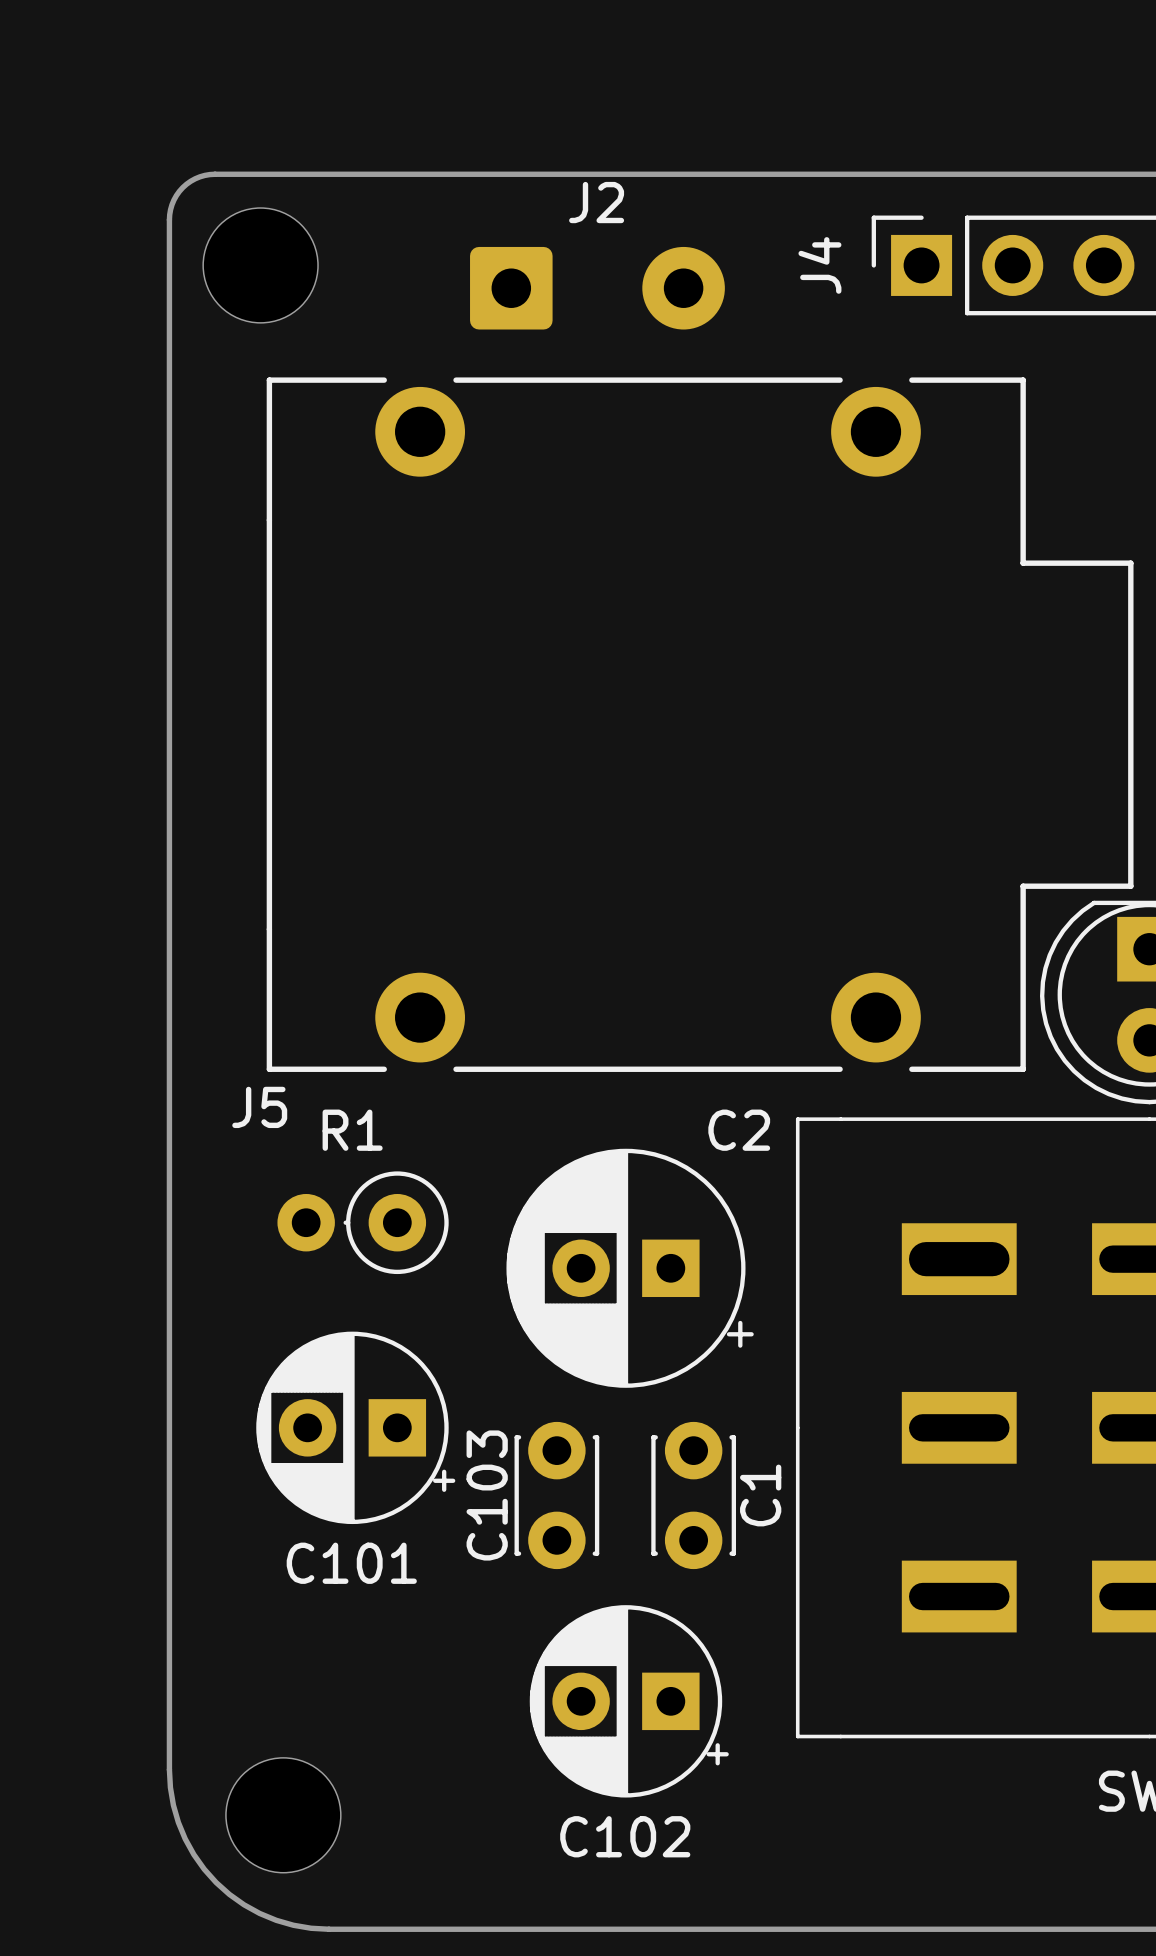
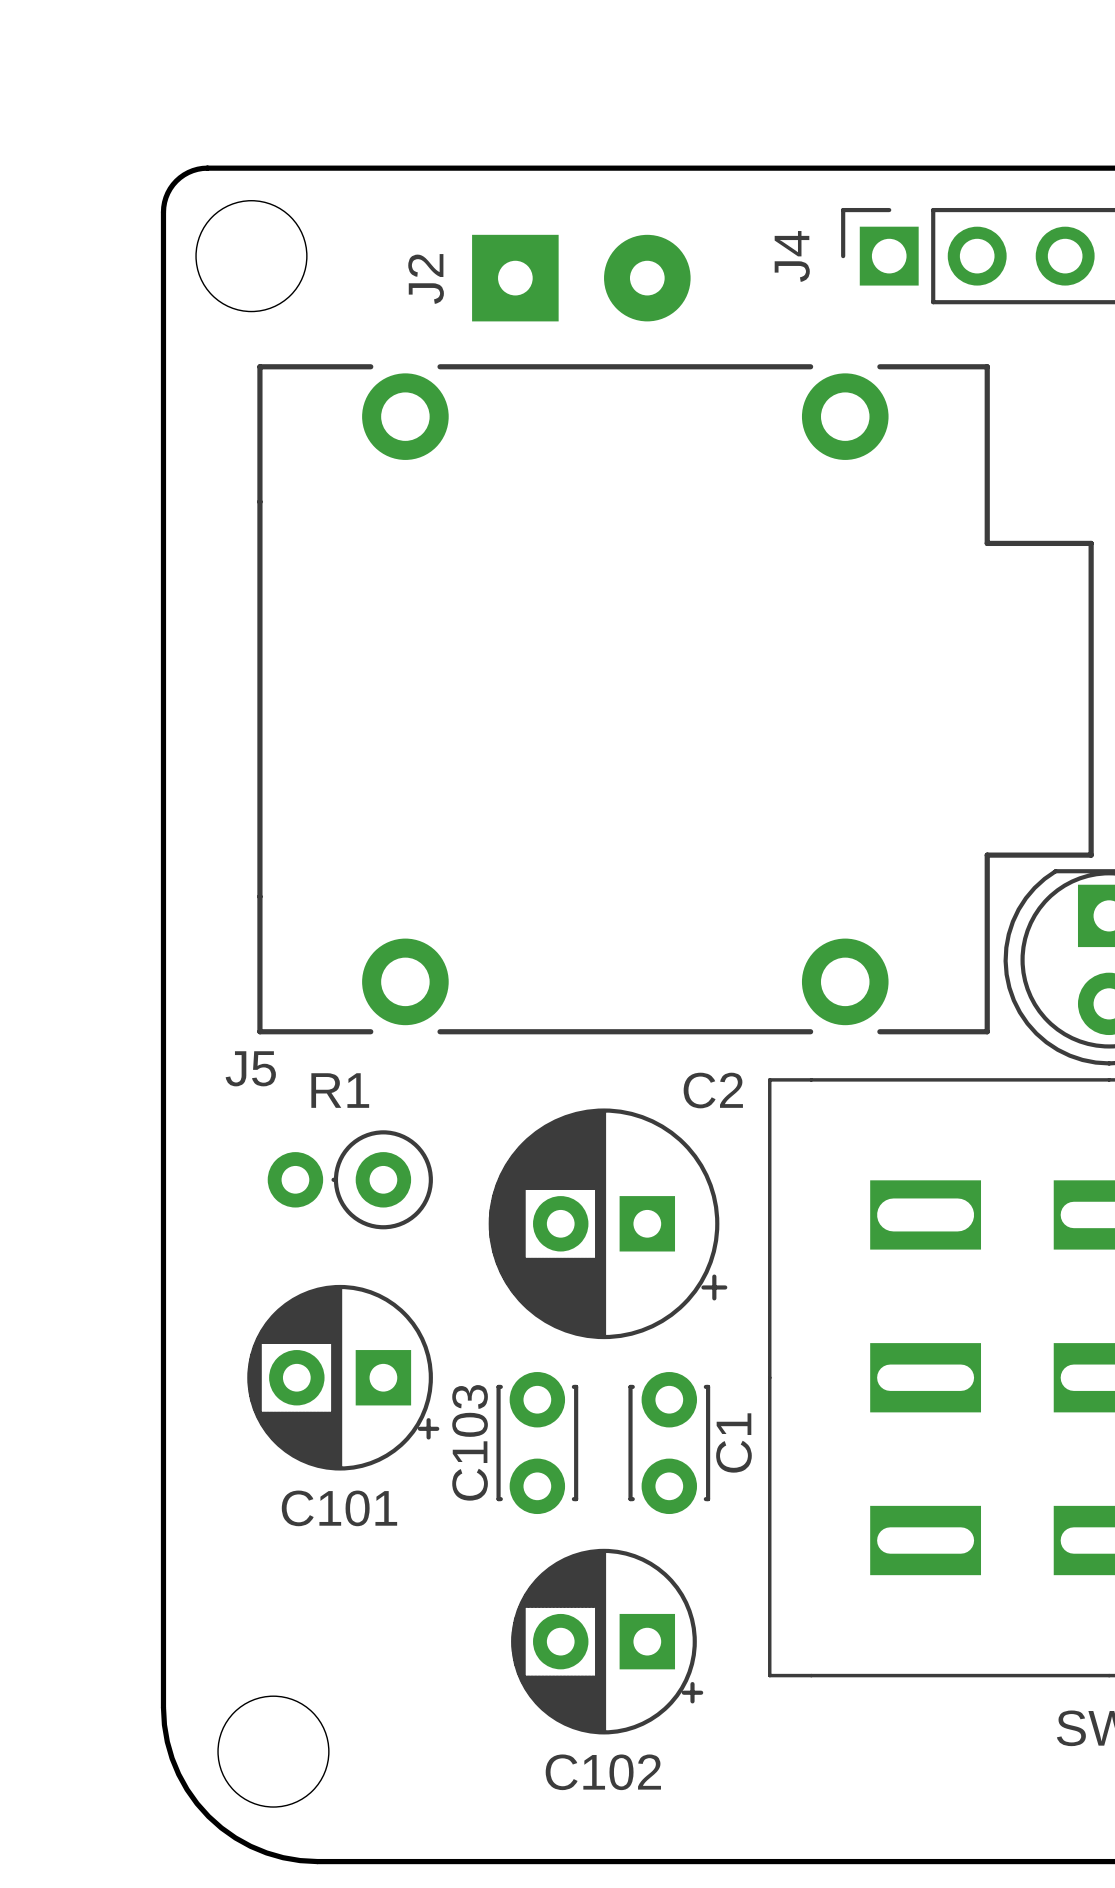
J2 name position: J2 (596, 202) -> J2 (426, 278)
J2 footprint: [470, 246, 725, 330] -> [472, 234, 691, 322]

